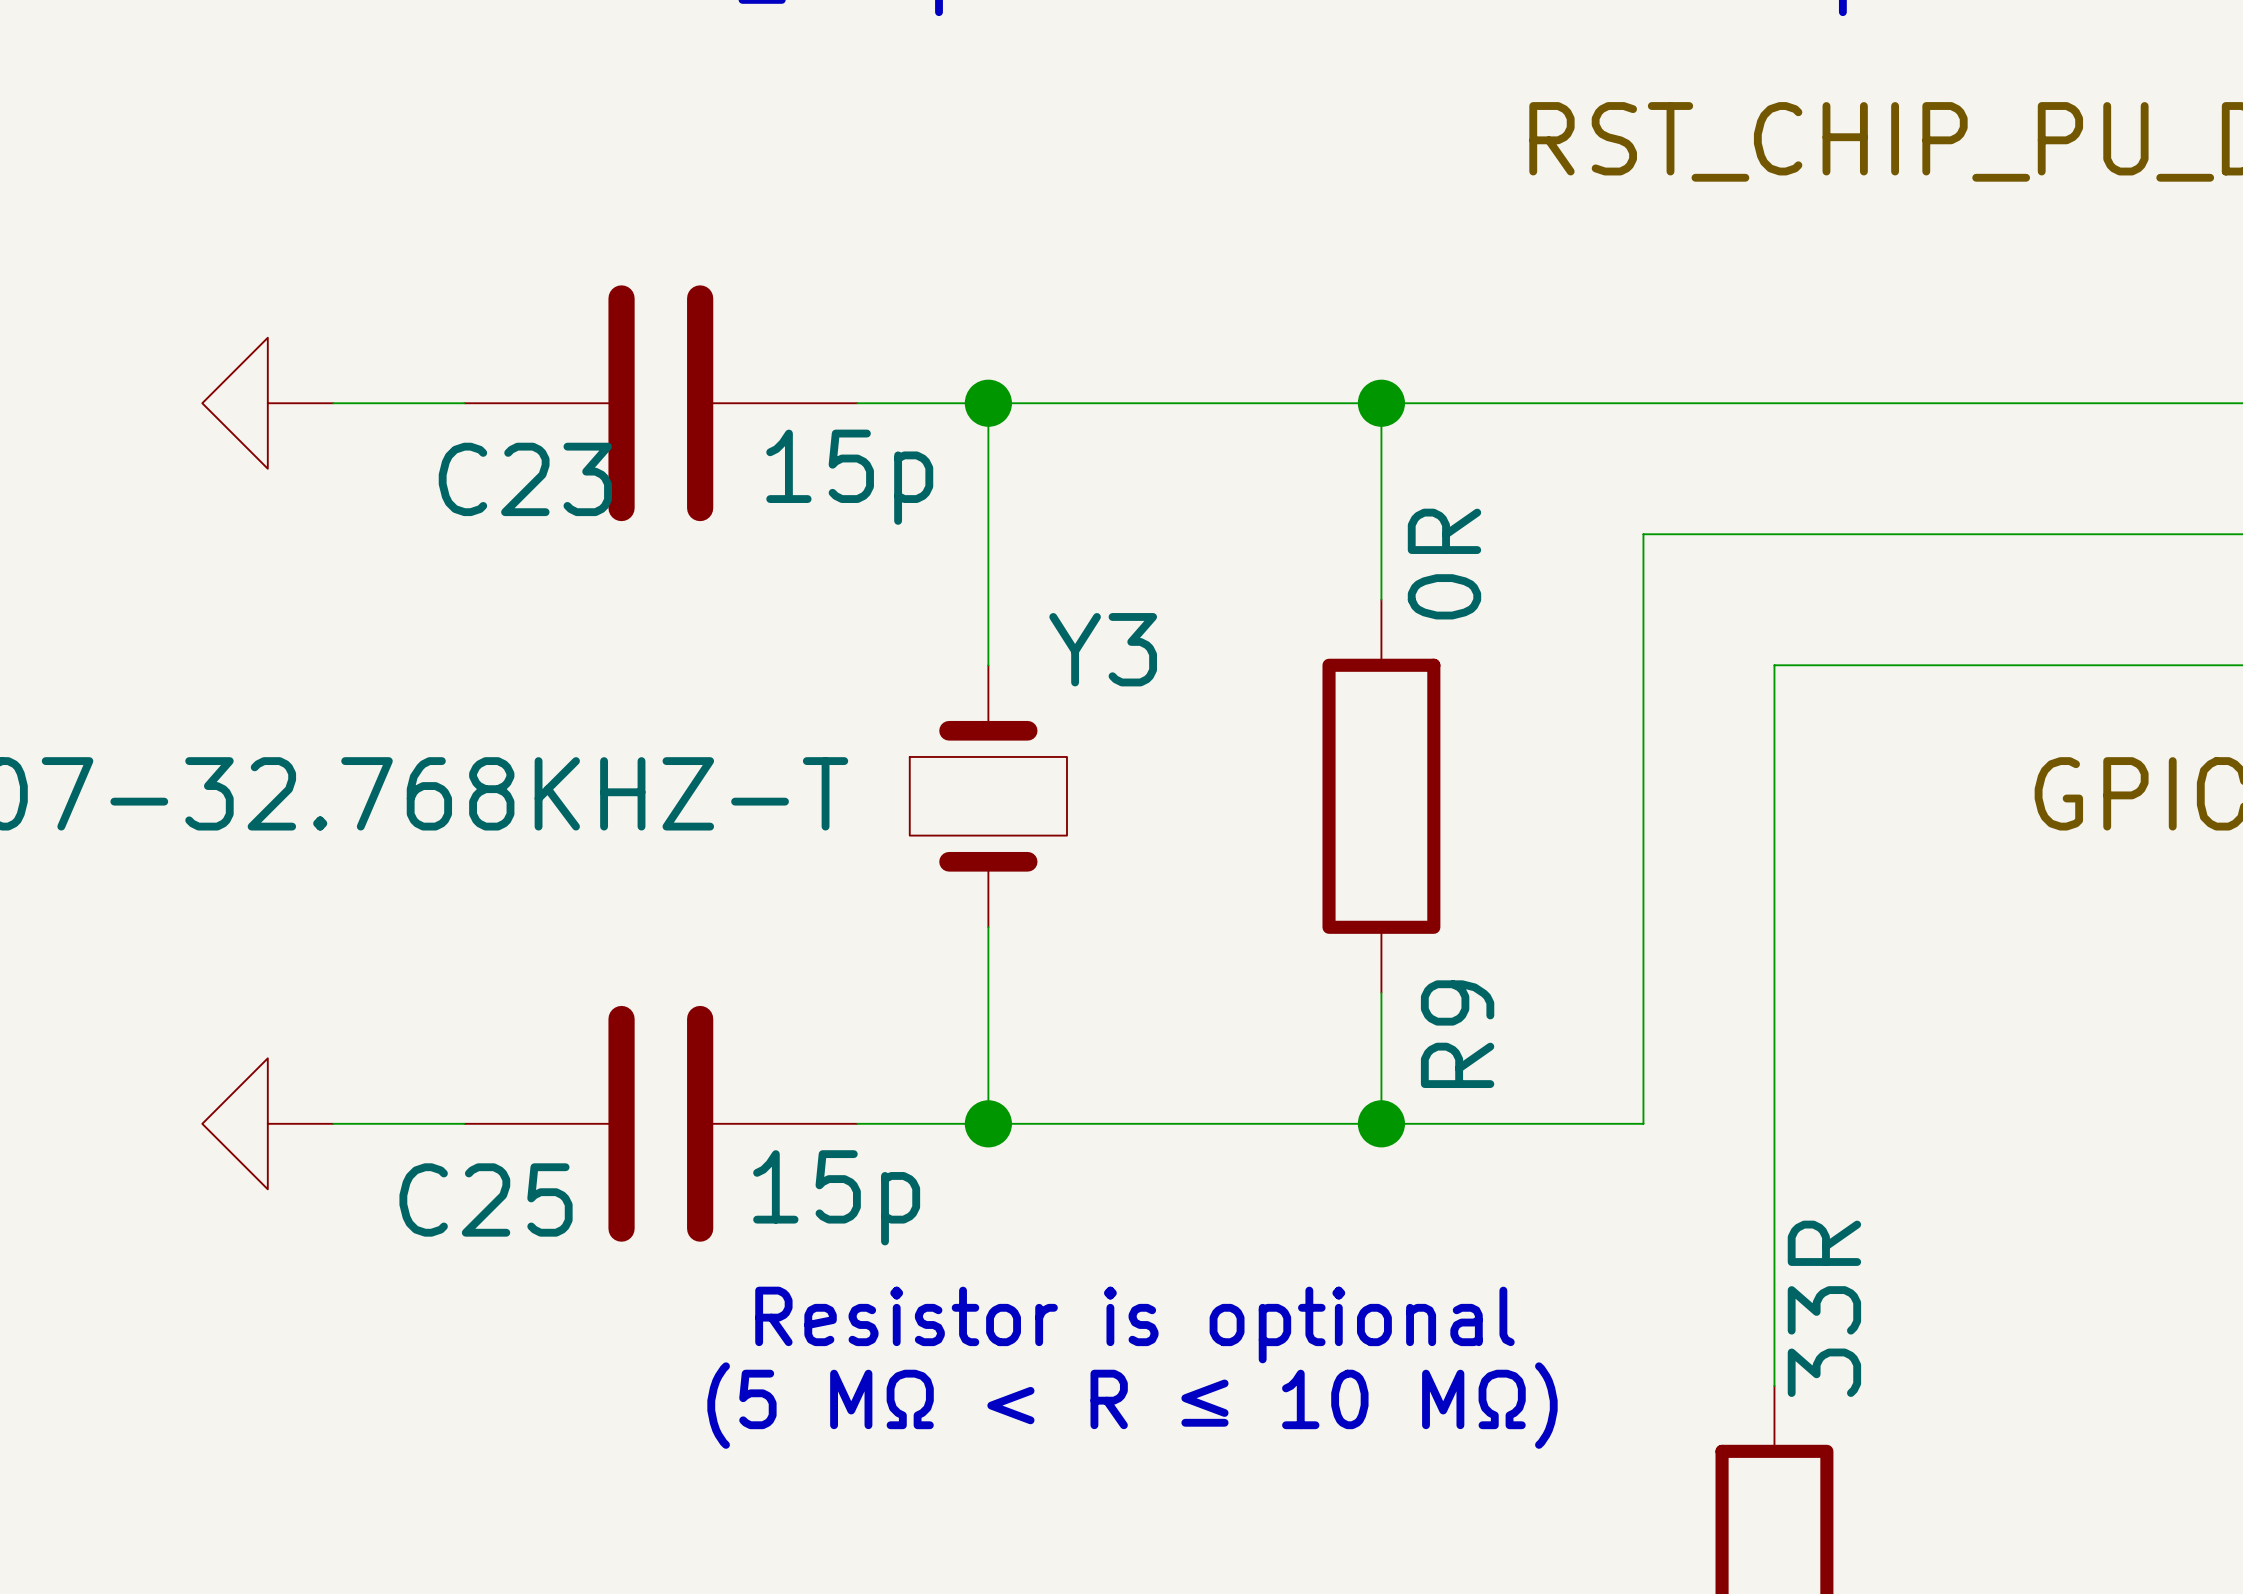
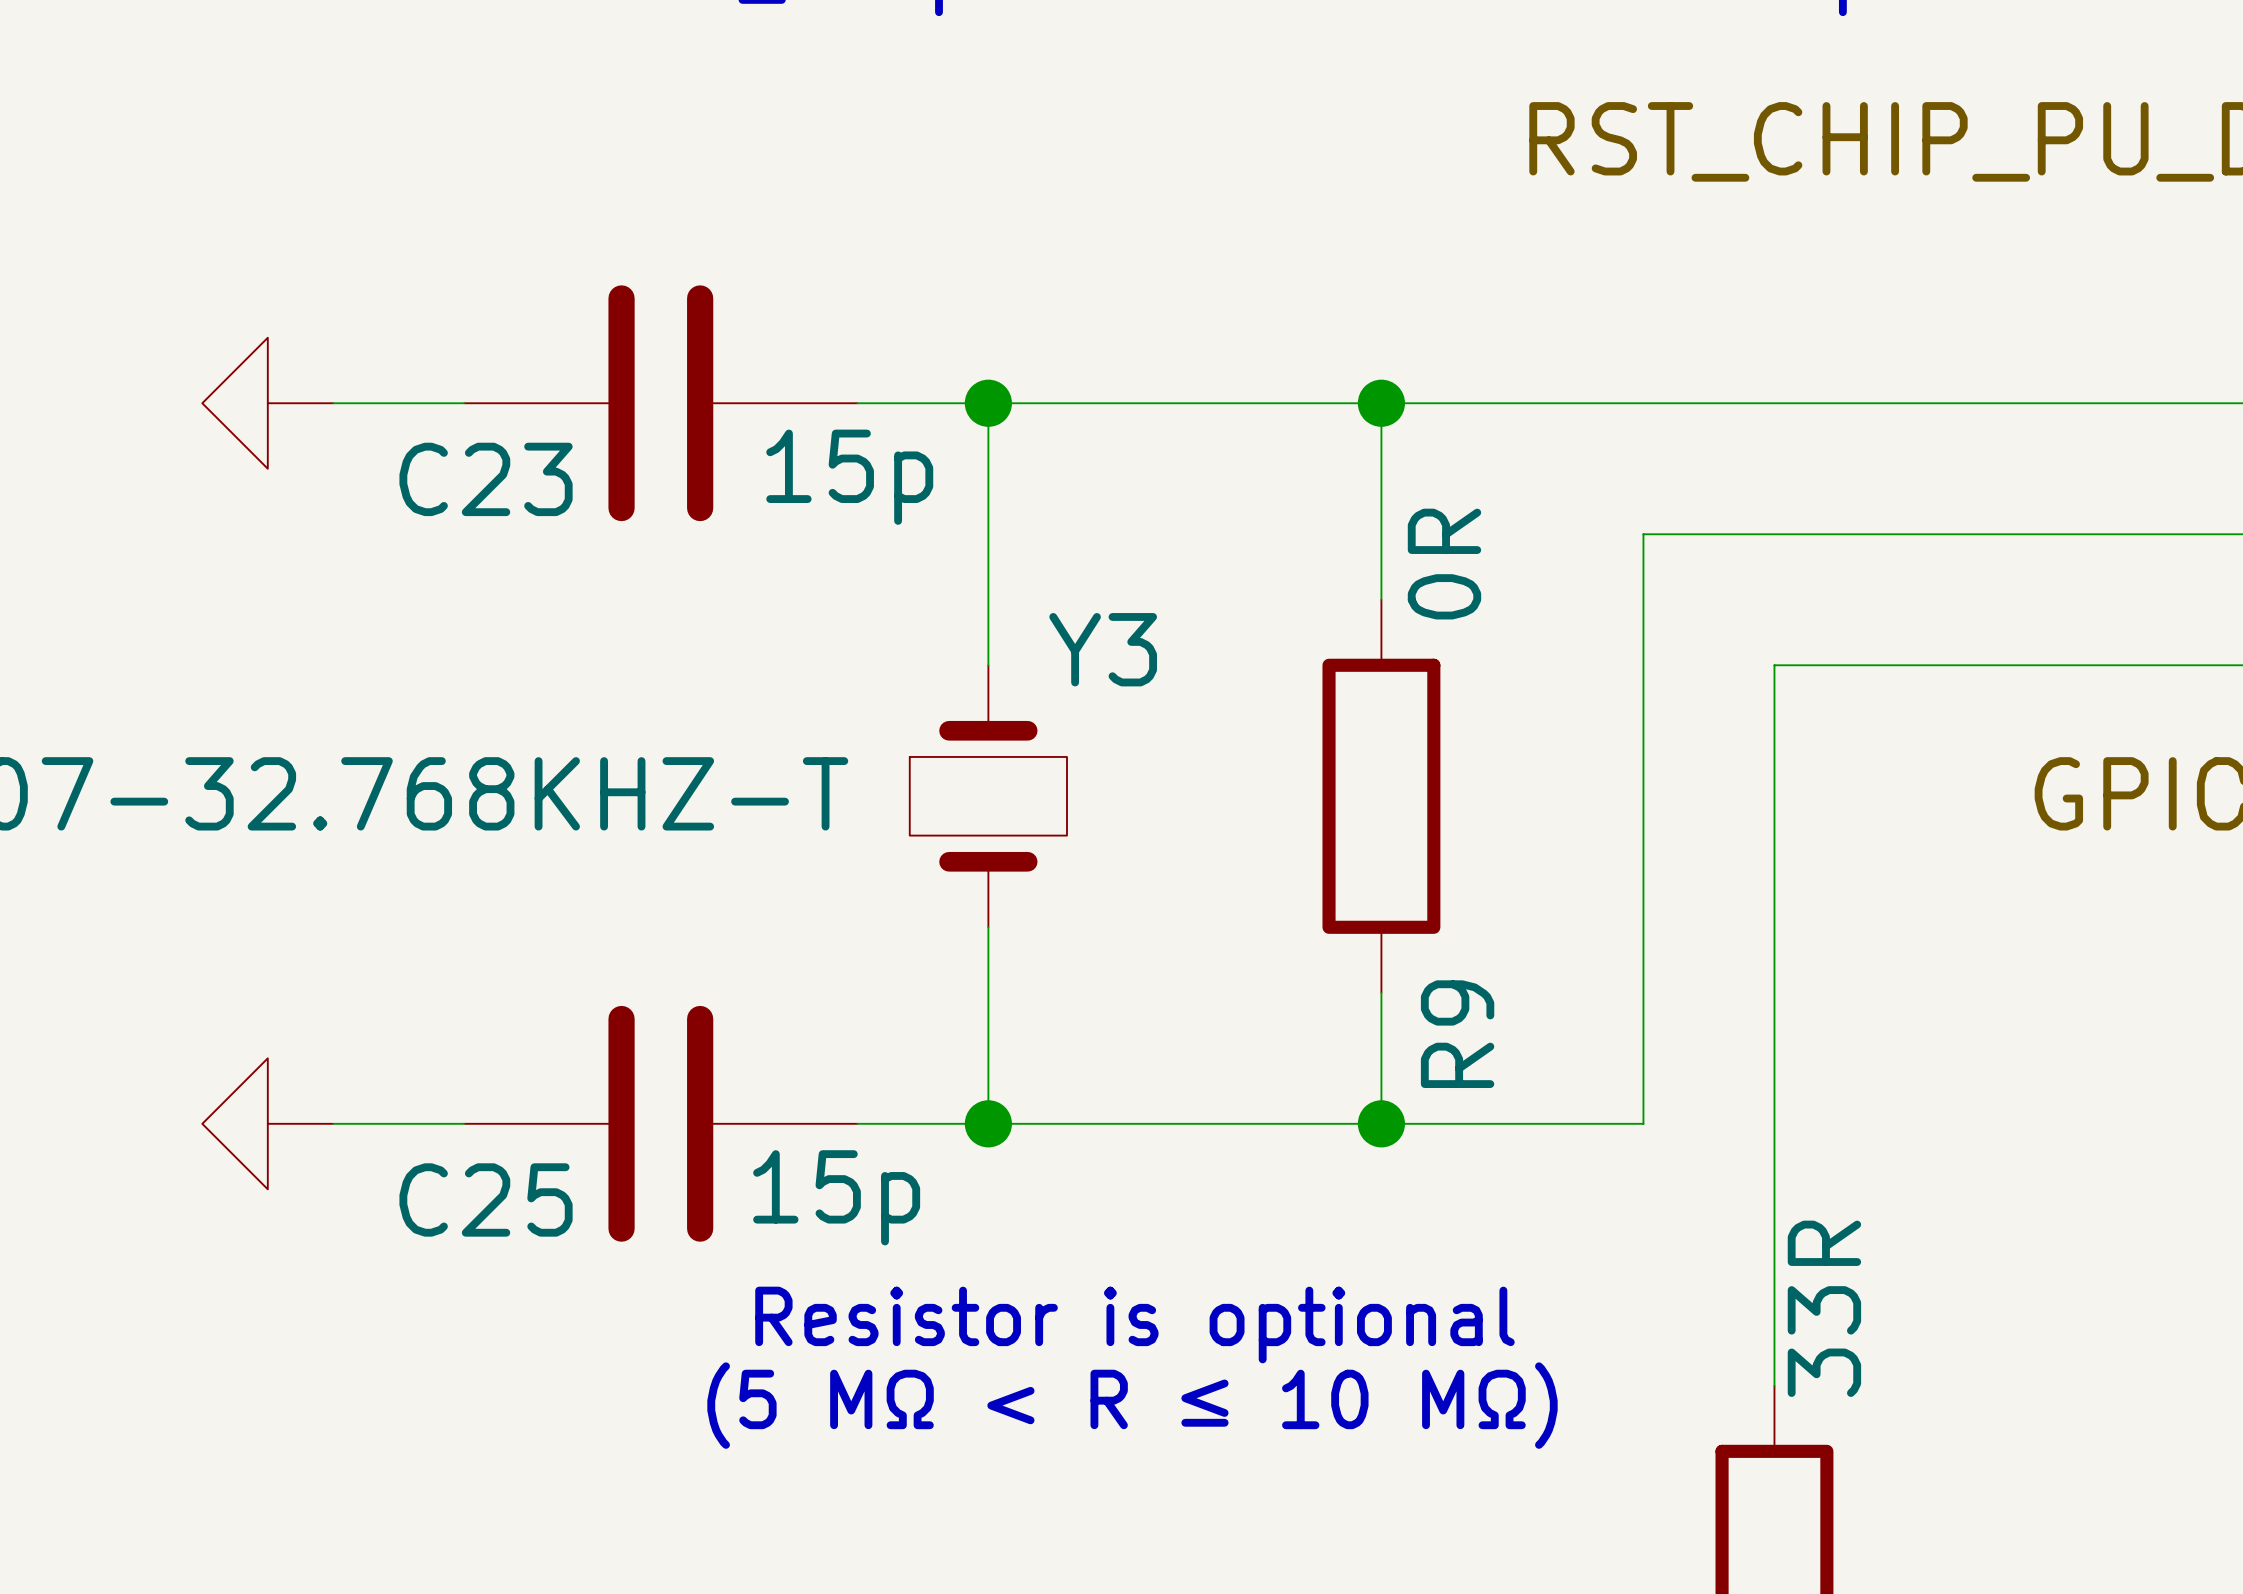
C23 name position: C23 (525, 479) -> C23 (486, 479)

